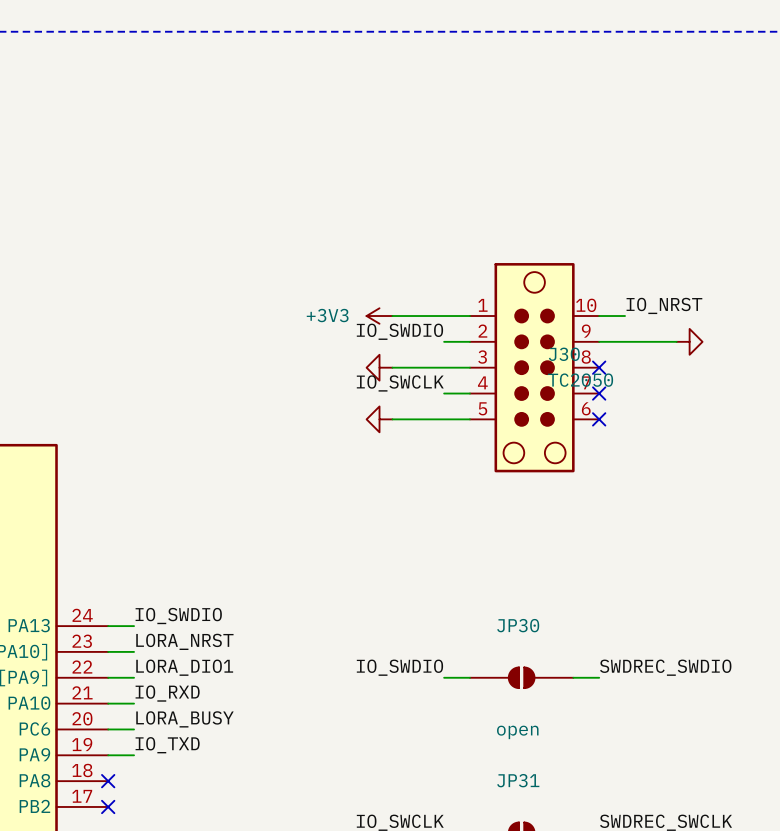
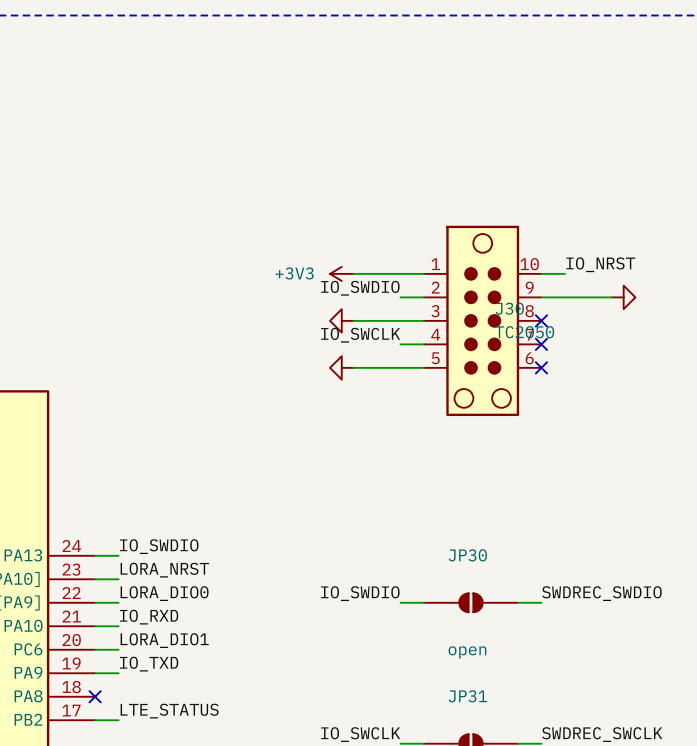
label: LORA_DIO1 (184, 667) -> LORA_DIO0 (164, 593)
label: LORA_BUSY (184, 719) -> LORA_DIO1 (164, 640)
label: none -> LTE_STATUS (169, 711)
wire: none -> (95, 720) (118, 720)
no-connect mark: (108, 806) -> none

